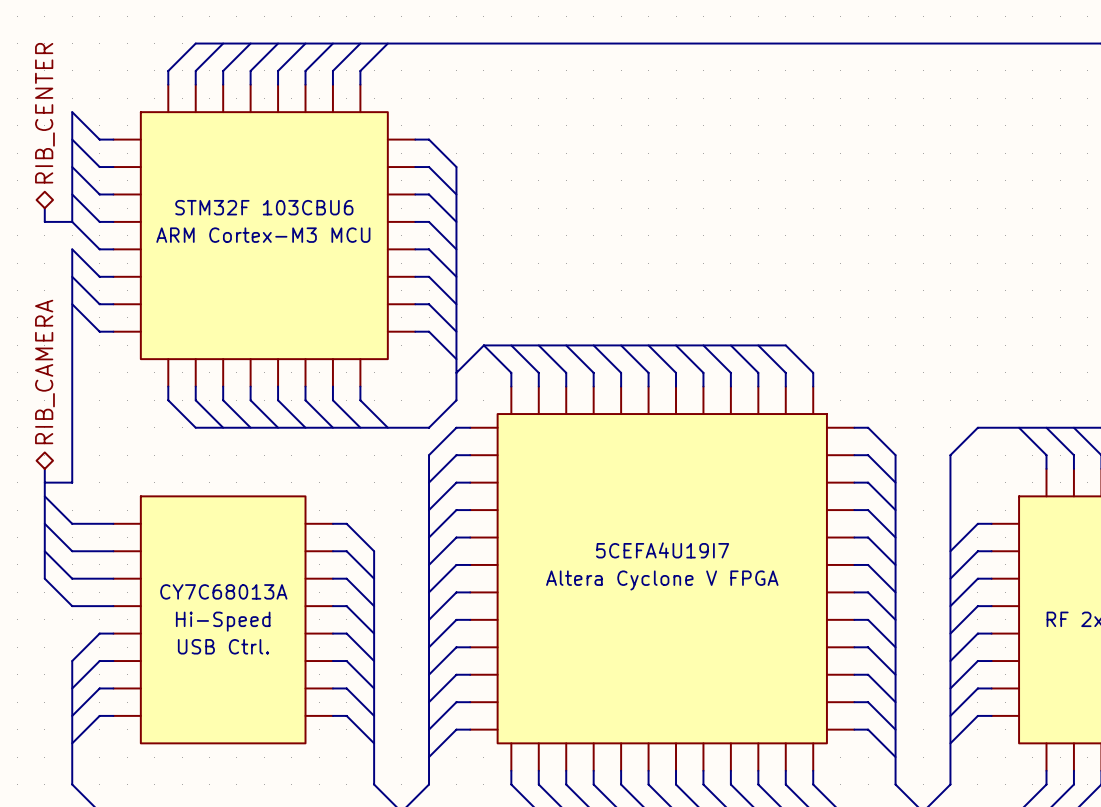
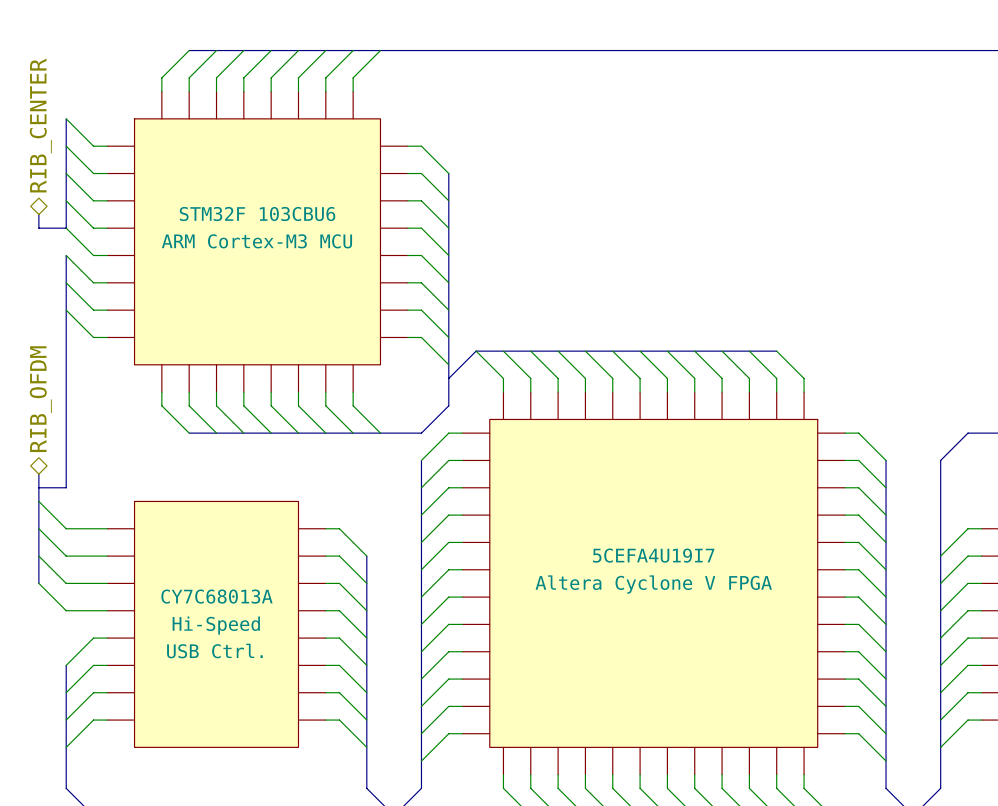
hierarchical label: RIB_CAMERA (44, 371) -> RIB_OFDM (40, 399)

